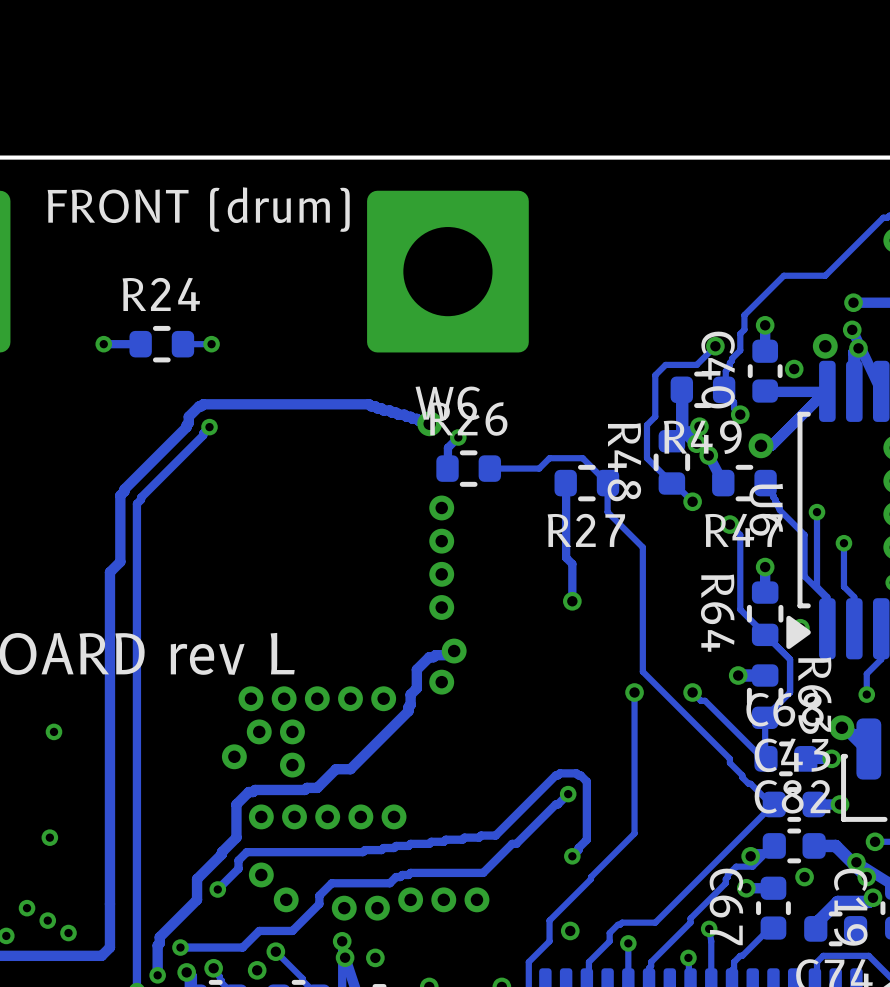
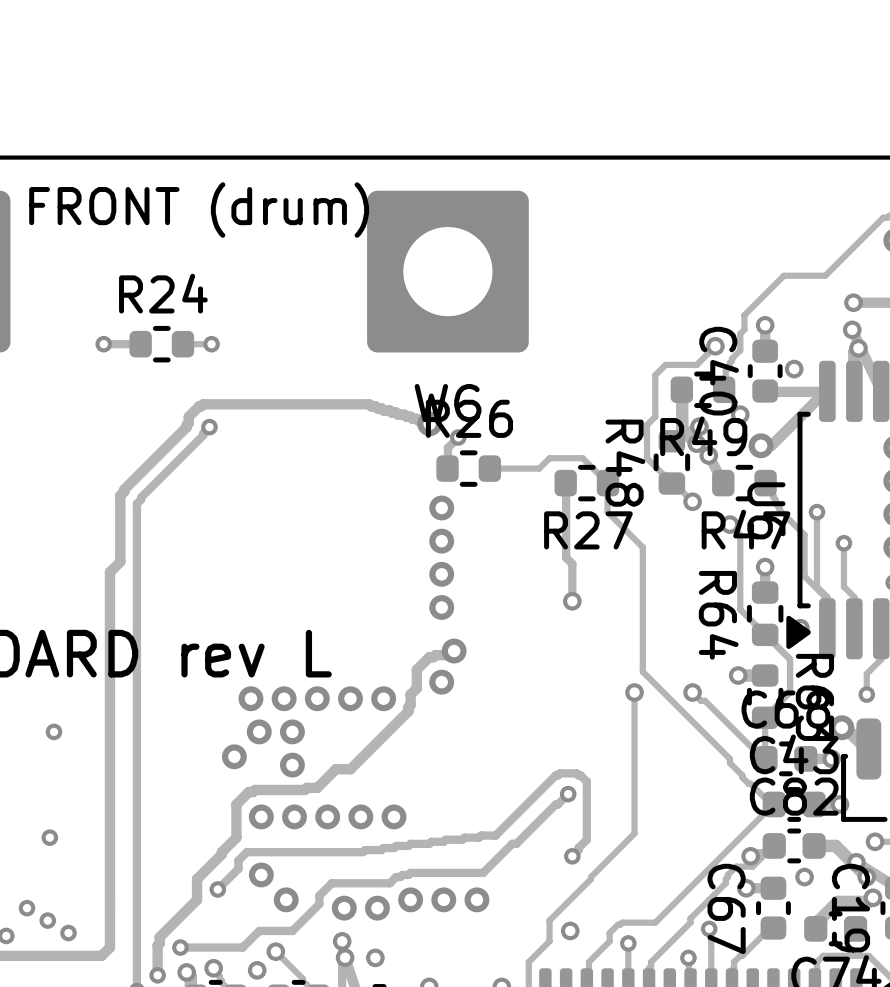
via: (825, 346) -> none

